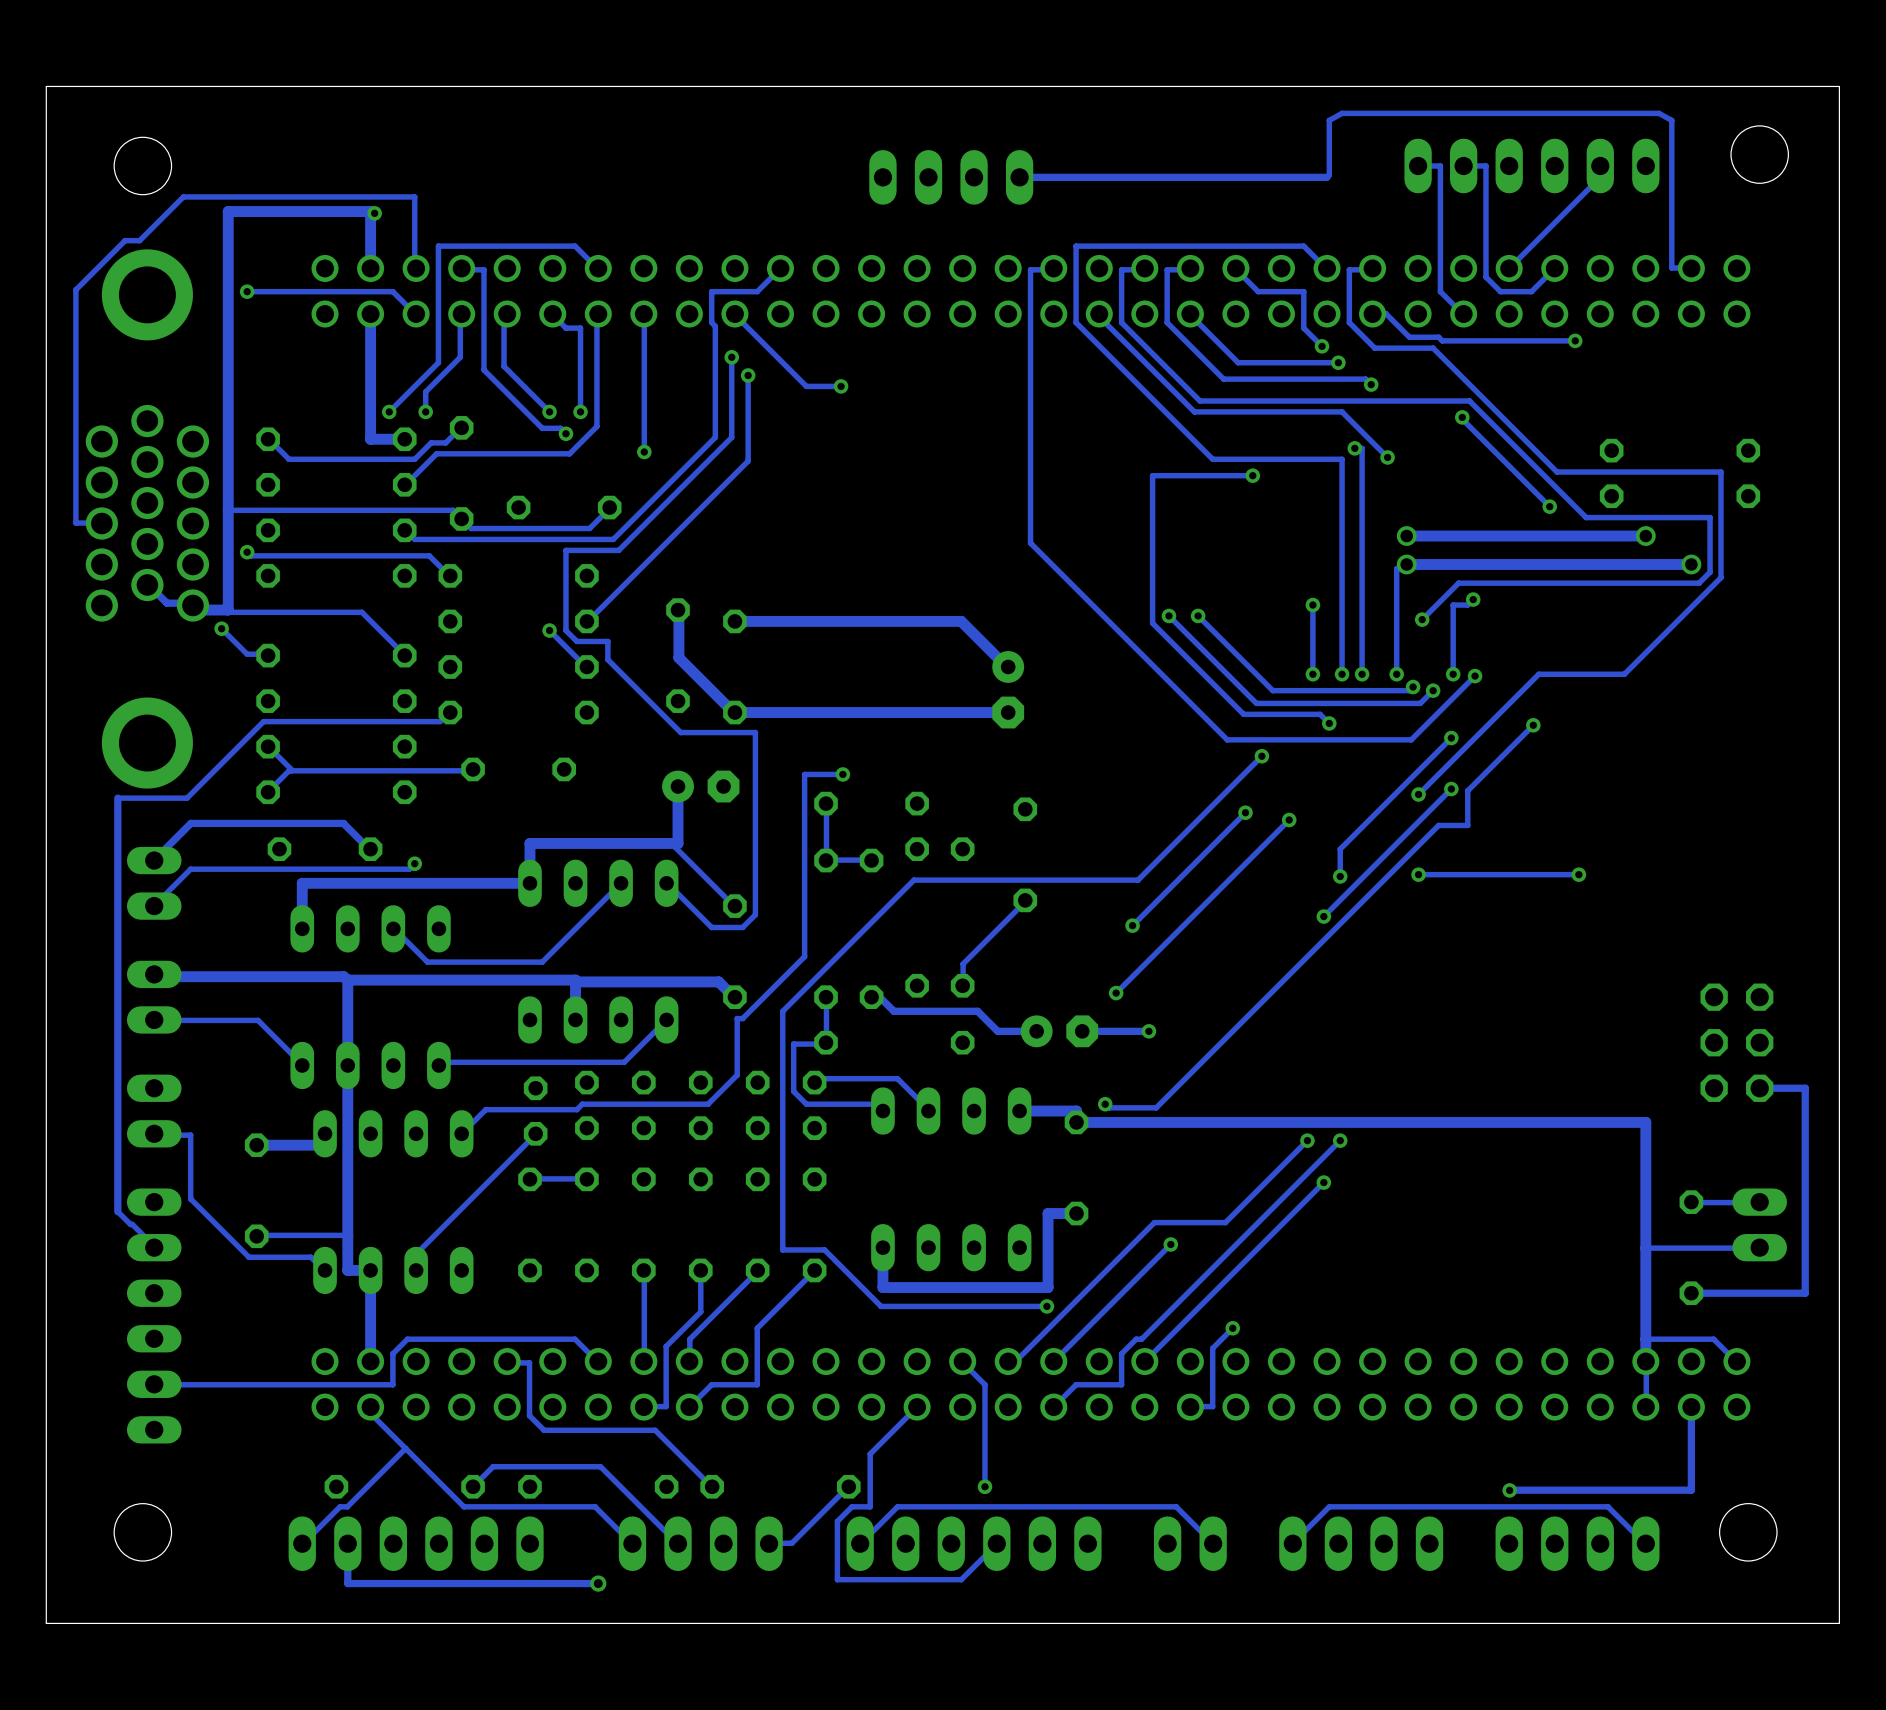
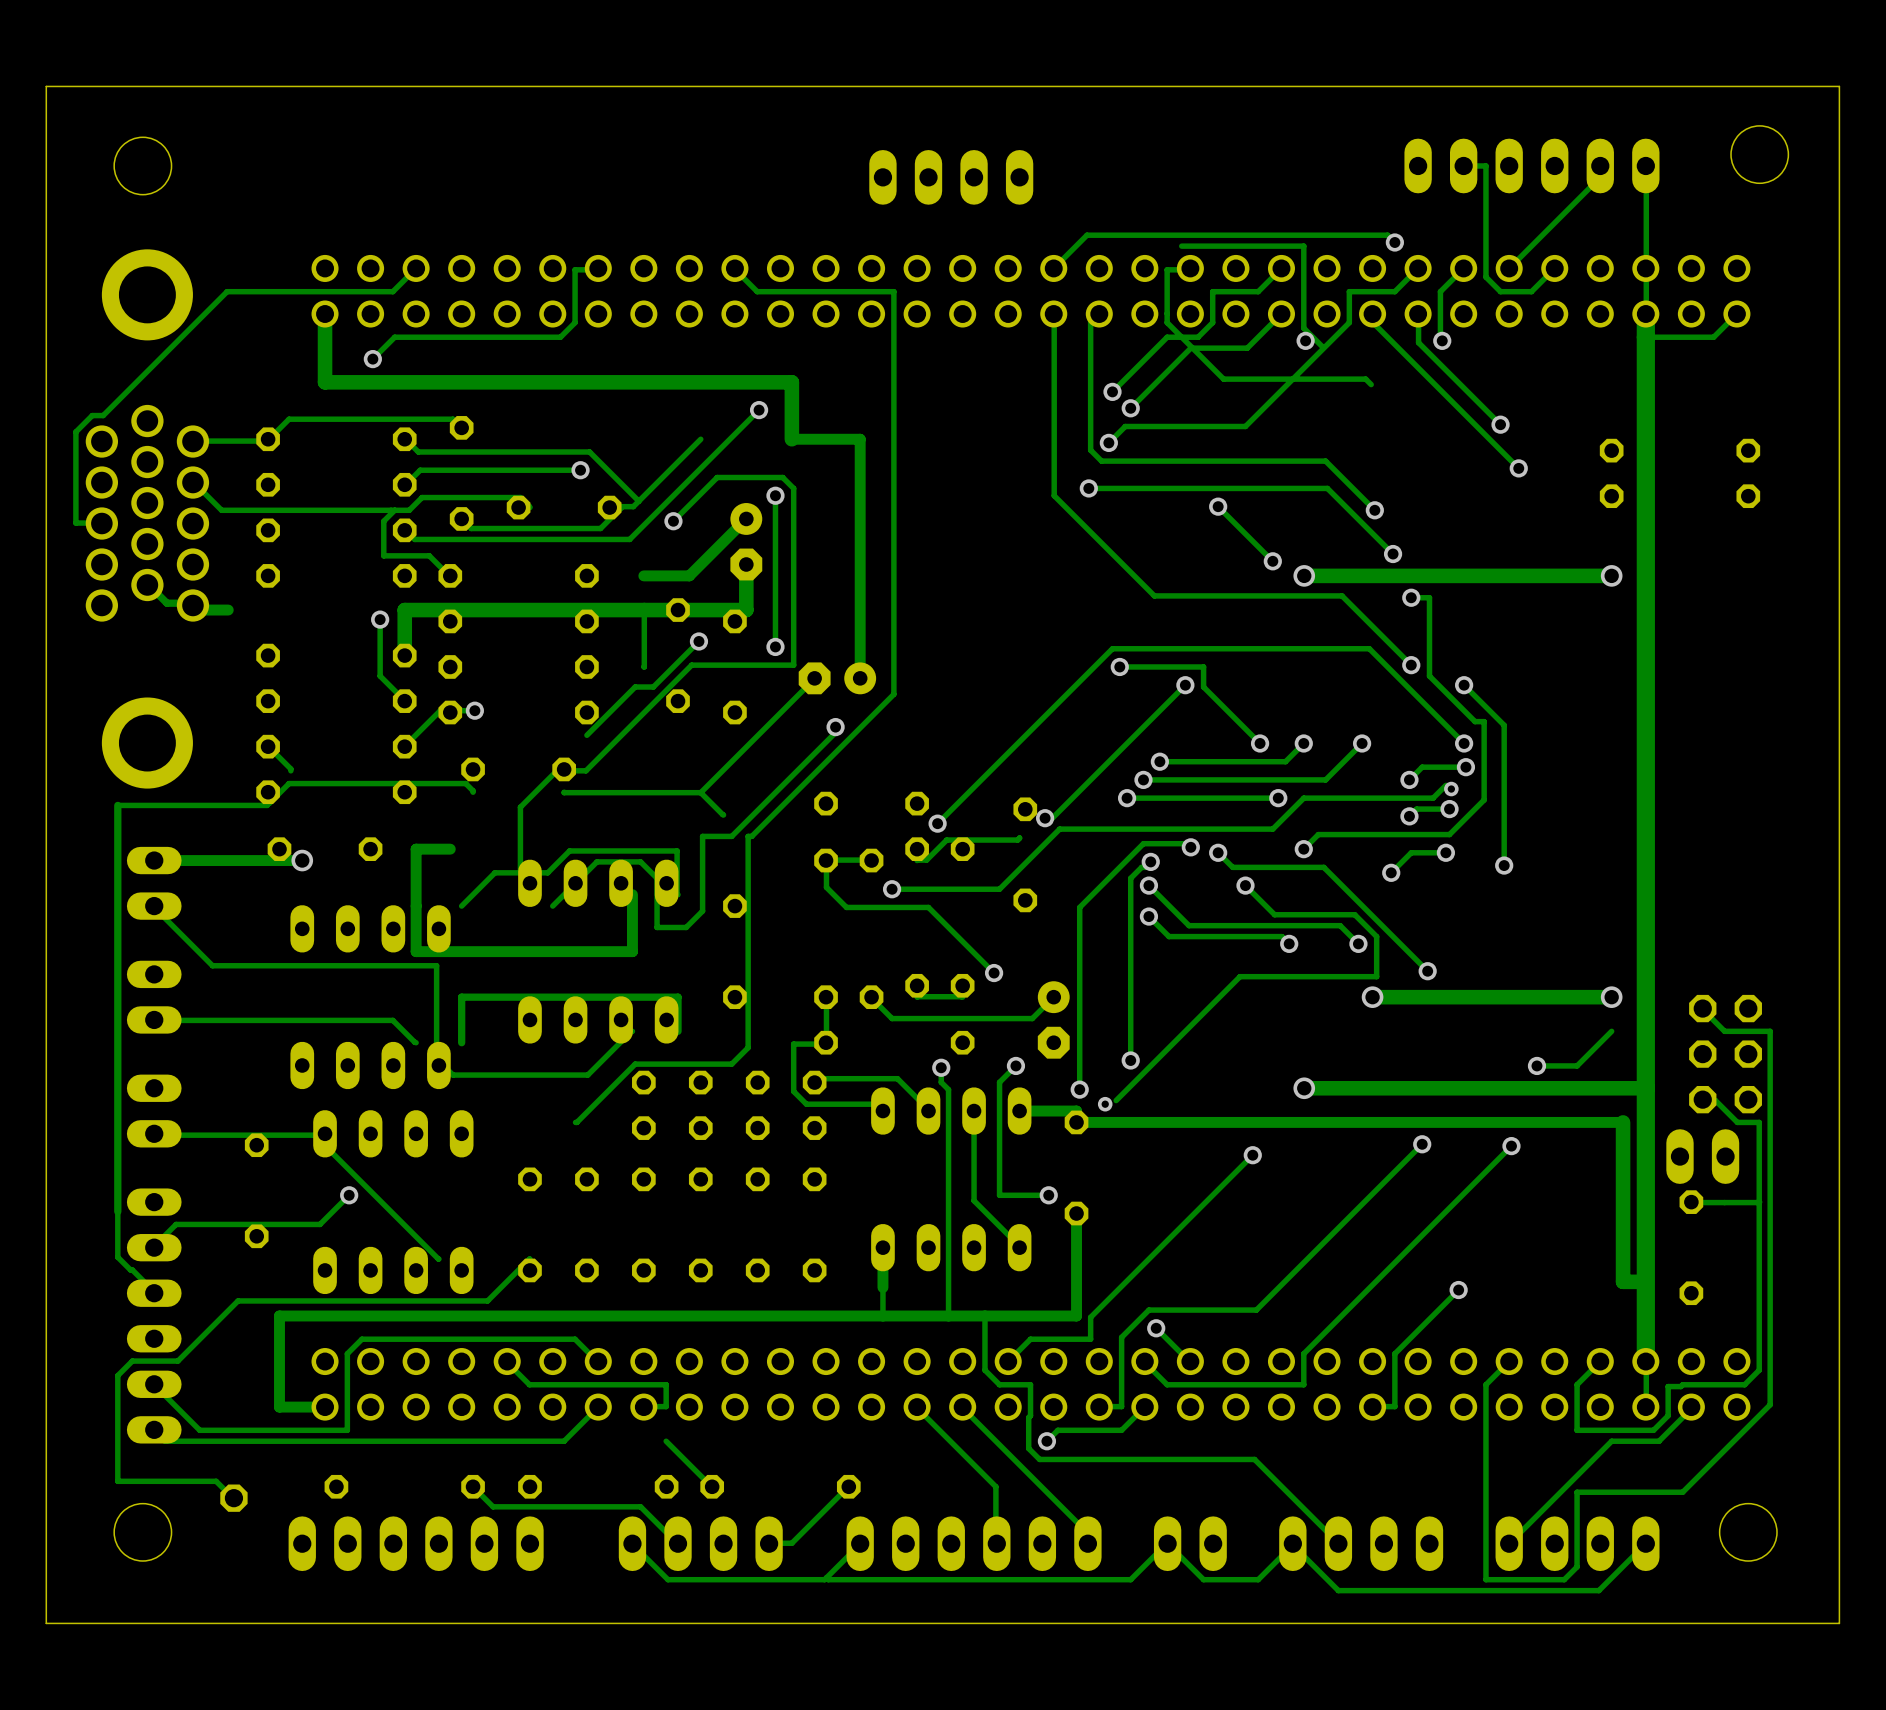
track: (1418, 165) (1440, 165) (1440, 291) (1463, 314) -> none
track: none -> (1645, 165) (1645, 1122)
track: (1019, 177) (1327, 177) (1329, 175) (1329, 120) (1342, 113) (1659, 113) (1671, 120) (1671, 268) (1691, 268) -> none
track: (370, 211) (228, 211) (228, 610) (232, 612) (361, 612) (404, 655) -> (746, 564) (746, 610) (404, 610) (404, 655)
track: (370, 211) (370, 268) -> none
via: (374, 213) -> none
via: none -> (1394, 242)
track: (1181, 246) (1076, 246) (1076, 322) (1212, 459) (1342, 459) (1342, 674) -> none
track: (1303, 246) (1327, 268) -> (1303, 246) (1303, 291)
track: (416, 268) (414, 196) (183, 196) (139, 240) (125, 240) (75, 289) (75, 431) -> (247, 291) (227, 291) (103, 415) (92, 415) (75, 431)
track: (461, 268) (483, 269) (483, 370) (542, 428) (560, 428) (565, 433) -> none
track: (598, 268) (575, 246) (438, 246) (438, 362) (389, 411) -> (598, 268) (575, 269) (575, 322) (560, 337) (394, 337) (372, 359)
track: none -> (734, 268) (757, 291) (893, 291) (893, 694) (751, 836) (748, 836) (748, 1047) (731, 1064) (635, 1064) (575, 1122)
track: (780, 268) (757, 291) (711, 291) (711, 322) (715, 326) (715, 437) (613, 539) -> (629, 539) (613, 539)
track: (1053, 268) (1030, 269) (1030, 543) (1227, 739) (1411, 739) (1475, 676) -> (1053, 268) (1087, 235) (1387, 235) (1394, 242)
track: (1144, 268) (1121, 269) (1121, 322) (1199, 400) (1469, 400) (1586, 517) (1710, 517) (1710, 572) (1699, 583) (1458, 583) (1422, 619) -> none
track: (1235, 268) (1258, 291) (1303, 291) -> none
track: none -> (1281, 268) (1258, 291) (1212, 291) (1212, 322) (1198, 337) (1167, 337) (1112, 391)
track: (1372, 268) (1349, 269) (1349, 291) -> (1418, 268) (1394, 291) (1349, 291)
track: none -> (1463, 268) (1440, 291) (1440, 340) (1442, 340)
via: (247, 291) -> none
track: (392, 291) (416, 314) -> (392, 291) (416, 268)
track: none -> (325, 314) (325, 382) (791, 382) (791, 439) (860, 439) (860, 678)
track: (370, 314) (370, 439) (404, 439) -> (638, 501) (589, 452) (418, 452) (404, 439)
track: (461, 314) (460, 357) (425, 391) (425, 411) -> none
track: (507, 314) (504, 315) (504, 366) (549, 411) -> none
track: (552, 314) (565, 328) (580, 328) (580, 411) -> none
track: (598, 314) (596, 426) (569, 453) (436, 453) (420, 470) -> (580, 470) (420, 470)
track: (643, 314) (644, 452) -> none
track: (734, 314) (806, 386) (841, 386) -> none
track: none -> (1053, 314) (1054, 495) (1154, 595) (1342, 595) (1411, 665)
track: (1190, 314) (1238, 362) (1338, 362) -> none
track: none -> (1281, 314) (1247, 348) (1190, 348) (1130, 408)
track: (1372, 314) (1385, 313) (1409, 337) (1438, 337) (1442, 340) (1575, 340) -> (1372, 314) (1373, 322) (1518, 468)
track: none -> (1418, 314) (1418, 342) (1500, 424)
track: none -> (1736, 314) (1713, 337) (1645, 337)
track: (1097, 315) (1194, 411) (1342, 411) (1387, 457) -> (1097, 315) (1090, 315) (1090, 450) (1101, 461) (1325, 461) (1374, 510)
track: (1349, 322) (1374, 348) (1433, 348) (1557, 472) (1720, 472) (1720, 577) (1624, 674) (1538, 674) (1418, 794) -> (1349, 322) (1245, 426) (1125, 426) (1108, 442)
via: none -> (1442, 340)
via: (1575, 340) -> none
via position: (1322, 346) -> (1305, 340)
track: (731, 357) (731, 437) -> (759, 410) (731, 437)
via: (731, 357) -> none
via: none -> (372, 359)
via: (1338, 362) -> none
track: (748, 375) (748, 461) (586, 621) -> none
via: (748, 375) -> none
via: (1371, 384) -> none
via: (841, 386) -> none
via: none -> (1112, 391)
via: none -> (1130, 408)
via: none -> (759, 410)
via: (389, 411) -> none
via: (425, 411) -> none
via: (549, 411) -> none
via: (580, 411) -> none
track: (1462, 417) (1549, 506) -> none
via: (1462, 417) -> none
via: none -> (1500, 424)
track: (461, 427) (445, 442) (431, 442) (414, 459) (289, 459) (269, 439) -> (461, 427) (453, 419) (289, 419) (269, 439)
via: (565, 433) -> none
track: none -> (268, 439) (267, 441) (192, 441)
via: none -> (1108, 442)
track: (1354, 448) (1362, 448) (1362, 674) -> none
via: (1354, 448) -> none
via: (644, 452) -> none
via: (1387, 457) -> none
via: none -> (1518, 468)
via: none -> (580, 470)
track: (1252, 475) (1152, 475) (1152, 623) (1243, 714) (1320, 714) (1329, 723) -> none
via: (1252, 475) -> none
track: none -> (192, 482) (221, 510) (228, 510)
track: none -> (1088, 488) (1327, 488) (1393, 554)
via: none -> (1088, 488)
track: none -> (775, 495) (775, 646)
via: none -> (775, 495)
track: none -> (1218, 506) (1272, 561)
via: none -> (1218, 506)
via: (1549, 506) -> none
track: (609, 507) (589, 528) -> (700, 439) (633, 506) (622, 506) (600, 528) (589, 528)
track: (409, 510) (453, 510) (461, 518) -> (409, 510) (422, 497) (520, 497) (529, 507)
via: none -> (1374, 510)
track: none -> (746, 518) (689, 575) (643, 575)
track: none -> (673, 521) (717, 477) (782, 477) (793, 488) (793, 665) (691, 665) (586, 770) (556, 770) (520, 807) (520, 872)
via: none -> (673, 521)
via: (1406, 536) -> none
track: (1645, 536) (1406, 536) -> none
via: (1645, 536) -> none
track: (629, 539) (618, 550) (565, 550) (565, 630) (576, 641) (607, 641) (607, 659) (680, 732) (755, 732) (755, 914) (742, 927) (711, 927) (666, 883) -> none
part: none -> (746, 541)
track: (247, 552) (250, 555) (383, 555) -> (394, 510) (383, 521) (383, 555)
via: (247, 552) -> none
via: none -> (1393, 554)
via: none -> (1272, 561)
via: (1406, 564) -> none
track: (1691, 564) (1406, 564) (1403, 568) (1396, 568) (1396, 674) -> none
via: (1691, 564) -> none
via: none -> (1304, 575)
track: none -> (1611, 575) (1304, 575)
via: none -> (1611, 575)
track: none -> (1411, 597) (1429, 597) (1429, 676) (1475, 721) (1484, 721) (1484, 799) (1449, 834) (1318, 834) (1303, 849)
via: none -> (1411, 597)
track: (1473, 599) (1467, 605) (1453, 605) (1453, 674) -> none
via: (1473, 599) -> none
track: (1312, 605) (1312, 674) -> none
via: (1312, 605) -> none
track: none -> (644, 610) (643, 666)
track: (678, 610) (678, 657) (733, 712) (1008, 712) -> none
track: (1168, 615) (1256, 703) (1420, 703) (1433, 690) -> none
via: (1168, 615) -> none
track: (1198, 615) (1272, 690) (1409, 690) (1413, 687) -> none
via: (1198, 615) -> none
track: none -> (380, 619) (380, 676) (404, 701)
via: none -> (380, 619)
via: (1422, 619) -> none
track: (734, 621) (961, 621) (1008, 666) -> none
track: (221, 628) (247, 654) (268, 655) -> none
via: (221, 628) -> none
track: (549, 630) (586, 666) -> none
via: (549, 630) -> none
track: none -> (698, 641) (653, 687) (635, 687) (586, 735)
via: none -> (698, 641)
via: none -> (775, 646)
track: none -> (1119, 666) (1203, 666) (1203, 687) (1260, 743)
via: none -> (1119, 666)
via: (1312, 674) -> none
via: (1342, 674) -> none
via: (1362, 674) -> none
via position: (1396, 674) -> (1411, 665)
via: (1453, 674) -> none
via: (1475, 676) -> none
track: none -> (814, 678) (700, 792)
part: none -> (837, 678)
track: none -> (1185, 685) (1052, 818) (1045, 818)
via: none -> (1185, 685)
track: none -> (1464, 685) (1504, 725) (1504, 865)
via: none -> (1464, 685)
via: (1413, 687) -> none
part: (1008, 689) -> none
via: (1433, 690) -> none
track: none -> (474, 710) (440, 710) (404, 746)
via: none -> (474, 710)
track: (450, 712) (440, 721) (263, 721) (187, 798) (117, 798) (117, 805) -> (473, 792) (465, 783) (289, 783) (267, 805) (117, 805)
via: (1329, 723) -> none
track: (1533, 725) (1467, 790) (1467, 825) (1438, 825) (1411, 852) -> (1445, 852) (1411, 852)
via: (1533, 725) -> none
track: none -> (835, 727) (835, 732) (731, 836) (702, 836) (702, 911) (686, 927) (657, 927) (657, 878) (640, 861) (596, 861) (552, 906)
via: none -> (835, 727)
track: (1451, 738) (1422, 767) -> (1465, 767) (1422, 767)
via position: (1451, 738) -> (1464, 743)
track: none -> (1303, 743) (1285, 761) (1159, 761)
via: none -> (1303, 743)
track: none -> (1362, 743) (1325, 779) (1143, 779)
via: none -> (1362, 743)
track: none -> (1464, 743) (1369, 648) (1112, 648) (937, 823)
track: (1261, 756) (1138, 880) (913, 880) (782, 1011) (782, 1249) (824, 1249) (881, 1306) (1046, 1306) -> none
via position: (1261, 756) -> (1260, 743)
via: none -> (1159, 761)
via: none -> (1465, 767)
track: (473, 769) (289, 770) (268, 792) -> none
track: (842, 774) (804, 774) (804, 956) (742, 1018) (737, 1018) (737, 1075) (708, 1104) (582, 1104) (576, 1109) (485, 1109) (461, 1133) -> none
via: (842, 774) -> none
via: none -> (1143, 779)
track: (1409, 779) (1340, 849) (1340, 876) -> none
track: none -> (1445, 785) (1433, 798) (1303, 798) (1272, 829) (1059, 829) (999, 889) (892, 889)
track: (678, 786) (678, 843) -> none
part: (700, 786) -> none
track: (1451, 789) (1323, 916) -> none
track: none -> (564, 792) (700, 792)
track: none -> (700, 792) (723, 814)
via position: (1418, 794) -> (1409, 779)
via: none -> (1127, 798)
track: none -> (1278, 798) (1127, 798)
via: none -> (1278, 798)
track: (826, 803) (826, 860) (828, 860) -> (994, 973) (928, 907) (846, 907) (826, 887) (826, 860) (828, 860)
track: none -> (1449, 809) (1416, 809) (1409, 816)
via: none -> (1449, 809)
track: (1245, 812) (1132, 925) -> none
via: (1245, 812) -> none
via: none -> (1409, 816)
via: none -> (1045, 818)
track: (1289, 820) (1116, 993) -> none
via: (1289, 820) -> none
via: none -> (937, 823)
track: none -> (1019, 837) (1017, 840) (946, 840) (926, 860) (917, 860)
track: (678, 843) (529, 843) (529, 883) (302, 883) (302, 928) -> none
track: (678, 843) (675, 847) (734, 906) -> none
track: none -> (1190, 847) (1187, 843) (1143, 843) (1079, 907) (1079, 1089)
via: none -> (1190, 847)
track: (370, 849) (343, 823) (190, 823) (154, 860) -> (302, 860) (154, 860)
track: none -> (450, 849) (416, 849) (416, 951) (632, 951) (632, 894)
via: none -> (1303, 849)
track: none -> (1218, 852) (1232, 867) (1323, 867) (1427, 971)
via: none -> (1218, 852)
via: none -> (1445, 852)
via: none -> (302, 860)
track: none -> (1150, 861) (1145, 867) (1141, 867) (1130, 878) (1130, 1060)
via: none -> (1150, 861)
track: (414, 863) (409, 869) (190, 869) (154, 906) -> (632, 1031) (587, 1075) (453, 1075) (436, 1058) (436, 965) (212, 965) (154, 906)
via: (414, 863) -> none
via: none -> (1504, 865)
track: (1391, 872) (1156, 1107) (1108, 1107) (1105, 1104) -> none
via: none -> (1391, 872)
via: (1418, 874) -> none
track: (1578, 874) (1418, 874) -> none
via: (1578, 874) -> none
via: (1340, 876) -> none
track: (621, 883) (542, 962) (427, 962) (393, 928) -> none
track: none -> (1148, 885) (1189, 925) (1340, 925) (1358, 943)
via: none -> (1148, 885)
track: none -> (1245, 885) (1274, 914) (1354, 914) (1376, 936) (1376, 976) (1240, 976) (1116, 1100)
via: none -> (1245, 885)
via: none -> (892, 889)
track: none -> (678, 894) (677, 850) (569, 850) (547, 872) (494, 872) (461, 906)
track: (1025, 900) (963, 963) (962, 985) -> none
track: none -> (1148, 916) (1168, 936) (1281, 936) (1289, 943)
via: none -> (1148, 916)
via: (1323, 916) -> none
via: (1132, 925) -> none
via: none -> (1289, 943)
via: none -> (1358, 943)
via: none -> (1427, 971)
via: none -> (994, 973)
track: (154, 974) (156, 976) (343, 976) (347, 980) -> none
track: (347, 980) (347, 1270) (370, 1270) (370, 1361) -> none
track: (347, 980) (575, 980) (575, 1019) -> none
track: (575, 981) (718, 981) (734, 997) -> none
via: (1116, 993) -> none
track: (871, 997) (879, 996) (893, 1011) (977, 1011) (997, 1031) (1036, 1031) -> (871, 997) (892, 1018) (1032, 1018) (1053, 997)
track: none -> (962, 997) (917, 997)
via: none -> (1372, 997)
track: none -> (1611, 997) (1372, 997)
via: none -> (1611, 997)
track: none -> (1702, 1008) (1724, 1031) (1770, 1031) (1770, 1404) (1682, 1492) (1577, 1492) (1577, 1566) (1564, 1579) (1485, 1579) (1485, 1384) (1509, 1361)
track: (666, 1019) (624, 1062) (442, 1062) (438, 1065) -> none
track: (258, 1020) (302, 1065) -> (258, 1020) (392, 1020) (416, 1042)
track: none -> (678, 1031) (678, 997) (461, 997) (461, 1042)
part rotation: 0° (1059, 1031) -> 90° clockwise (1053, 1019)
track: (1148, 1031) (1083, 1031) -> none
via: (1148, 1031) -> none
track: none -> (1611, 1031) (1577, 1065) (1536, 1065)
part position: (1736, 1042) -> (1725, 1054)
via: none -> (1130, 1060)
track: none -> (1015, 1065) (999, 1082) (999, 1195) (1048, 1195)
via: none -> (1015, 1065)
via: none -> (1536, 1065)
track: none -> (941, 1067) (941, 1082) (948, 1089) (948, 1315)
via: none -> (941, 1067)
via: none -> (1304, 1088)
track: none -> (1645, 1088) (1304, 1088)
track: (1759, 1088) (1805, 1088) (1805, 1293) (1691, 1293) -> none
via: none -> (1079, 1089)
track: none -> (1702, 1099) (1715, 1100) (1737, 1122) (1759, 1122) (1759, 1370) (1744, 1384) (1668, 1386) (1668, 1415) (1653, 1430) (1577, 1430) (1577, 1384) (1600, 1361)
part: (586, 1105) -> none
part: (535, 1111) -> none
track: none -> (974, 1111) (974, 1200) (1019, 1247)
track: (1645, 1122) (1623, 1122) -> (1645, 1281) (1623, 1281) (1623, 1122)
track width: thin (1645, 1122) (1645, 1361) -> thick (1645, 1122) (1645, 1361)
track: (325, 1133) (325, 1145) (256, 1145) -> none
track: (535, 1133) (416, 1253) (416, 1270) -> none
track: (190, 1135) (190, 1198) (248, 1257) (310, 1257) (325, 1270) -> (190, 1135) (314, 1135) (438, 1259)
track: (1307, 1140) (1225, 1222) (1154, 1222) (1015, 1361) (1008, 1361) -> (1252, 1155) (1090, 1317) (1090, 1339) (1030, 1339) (1008, 1361)
via: (1307, 1140) -> none
track: (1340, 1140) (1141, 1339) (1136, 1339) (1121, 1353) -> (1422, 1144) (1256, 1310) (1148, 1310) (1121, 1337) (1121, 1353)
via: (1340, 1140) -> none
via: none -> (1422, 1144)
via: none -> (1511, 1146)
via: none -> (1252, 1155)
track: (586, 1179) (529, 1179) -> none
track: (1323, 1182) (1144, 1361) -> (1511, 1146) (1303, 1353) (1303, 1384) (1167, 1384) (1144, 1361)
via: (1323, 1182) -> none
track: none -> (349, 1195) (320, 1224) (176, 1224) (154, 1246)
via: none -> (349, 1195)
via: none -> (1048, 1195)
track: (117, 1211) (154, 1246) -> (117, 1211) (117, 1257) (154, 1293)
track: (1076, 1213) (1048, 1213) (1048, 1287) (882, 1287) -> (882, 1315) (882, 1287)
track: none -> (1076, 1213) (1076, 1315) (279, 1315) (279, 1407) (325, 1407)
part rotation: 0° (1759, 1224) -> 90° clockwise (1702, 1156)
part position: (1759, 1224) -> (1702, 1156)
track: (347, 1235) (256, 1236) -> none
track: (1170, 1244) (1053, 1361) -> none
via: (1170, 1244) -> none
track: (1759, 1247) (1645, 1248) -> none
track: none -> (529, 1259) (487, 1300) (238, 1300) (177, 1361) (132, 1361) (117, 1375) (117, 1481) (216, 1481) (233, 1498)
track: (643, 1270) (643, 1361) -> none
track: (700, 1270) (700, 1311) (666, 1346) (666, 1384) -> none
track: (757, 1270) (689, 1339) (689, 1361) -> none
track: (814, 1270) (757, 1328) (757, 1384) (711, 1384) (689, 1407) -> none
track: none -> (1458, 1290) (1394, 1353) (1394, 1406) (1372, 1407)
via: none -> (1458, 1290)
via: (1046, 1306) -> none
track: none -> (984, 1315) (984, 1370) (999, 1384) (1030, 1384) (1028, 1448) (1039, 1459) (1254, 1459) (1338, 1543)
track: none -> (1156, 1328) (1190, 1361)
via: none -> (1156, 1328)
track: (1232, 1328) (1212, 1348) (1212, 1406) (1190, 1407) -> none
via: (1232, 1328) -> none
track: (407, 1339) (392, 1353) (392, 1384) (154, 1384) -> (407, 1339) (361, 1339) (347, 1353) (347, 1430) (199, 1430) (154, 1384)
track: (1645, 1339) (1713, 1339) (1736, 1361) -> none
track: (962, 1361) (984, 1384) (984, 1486) -> none
track: (507, 1362) (529, 1362) (529, 1415) (544, 1430) (655, 1430) (666, 1441) -> (507, 1362) (529, 1384) (666, 1384)
track: (1121, 1384) (1076, 1384) (1053, 1407) -> (1121, 1384) (1121, 1406) (1099, 1407)
track: (370, 1407) (371, 1413) (463, 1506) (493, 1506) -> (473, 1486) (493, 1506)
track: none -> (598, 1407) (564, 1441) (165, 1441) (154, 1429)
track: (917, 1407) (870, 1453) (870, 1506) (851, 1506) (837, 1521) (837, 1579) -> (917, 1407) (995, 1486) (996, 1543)
track: none -> (962, 1407) (1087, 1532) (1087, 1543)
track: none -> (1144, 1407) (1121, 1430) (1057, 1430) (1046, 1441)
track: (1691, 1407) (1691, 1490) (1509, 1490) -> (1691, 1407) (1659, 1441) (1611, 1441) (1509, 1543)
via: none -> (1046, 1441)
track: (405, 1448) (347, 1506) (340, 1506) (302, 1543) -> none
track: (473, 1486) (493, 1466) (600, 1466) (640, 1506) -> none
via: (984, 1486) -> none
via: (1509, 1490) -> none
part: none -> (233, 1498)
track: (595, 1506) (632, 1543) -> (595, 1506) (640, 1506)
track: (347, 1543) (347, 1583) (598, 1583) -> none
track: (996, 1543) (961, 1579) -> none
track: (1213, 1543) (1176, 1506) (897, 1506) (860, 1543) -> (632, 1543) (667, 1579) (824, 1579) (860, 1543)
track: (1645, 1543) (1608, 1506) (1329, 1506) (1292, 1543) -> (1645, 1543) (1598, 1590) (1338, 1590) (1292, 1543) (1258, 1579) (1203, 1579) (1167, 1543) (1130, 1579) (961, 1579)
track: none -> (826, 1577) (837, 1579)
via: (598, 1583) -> none

